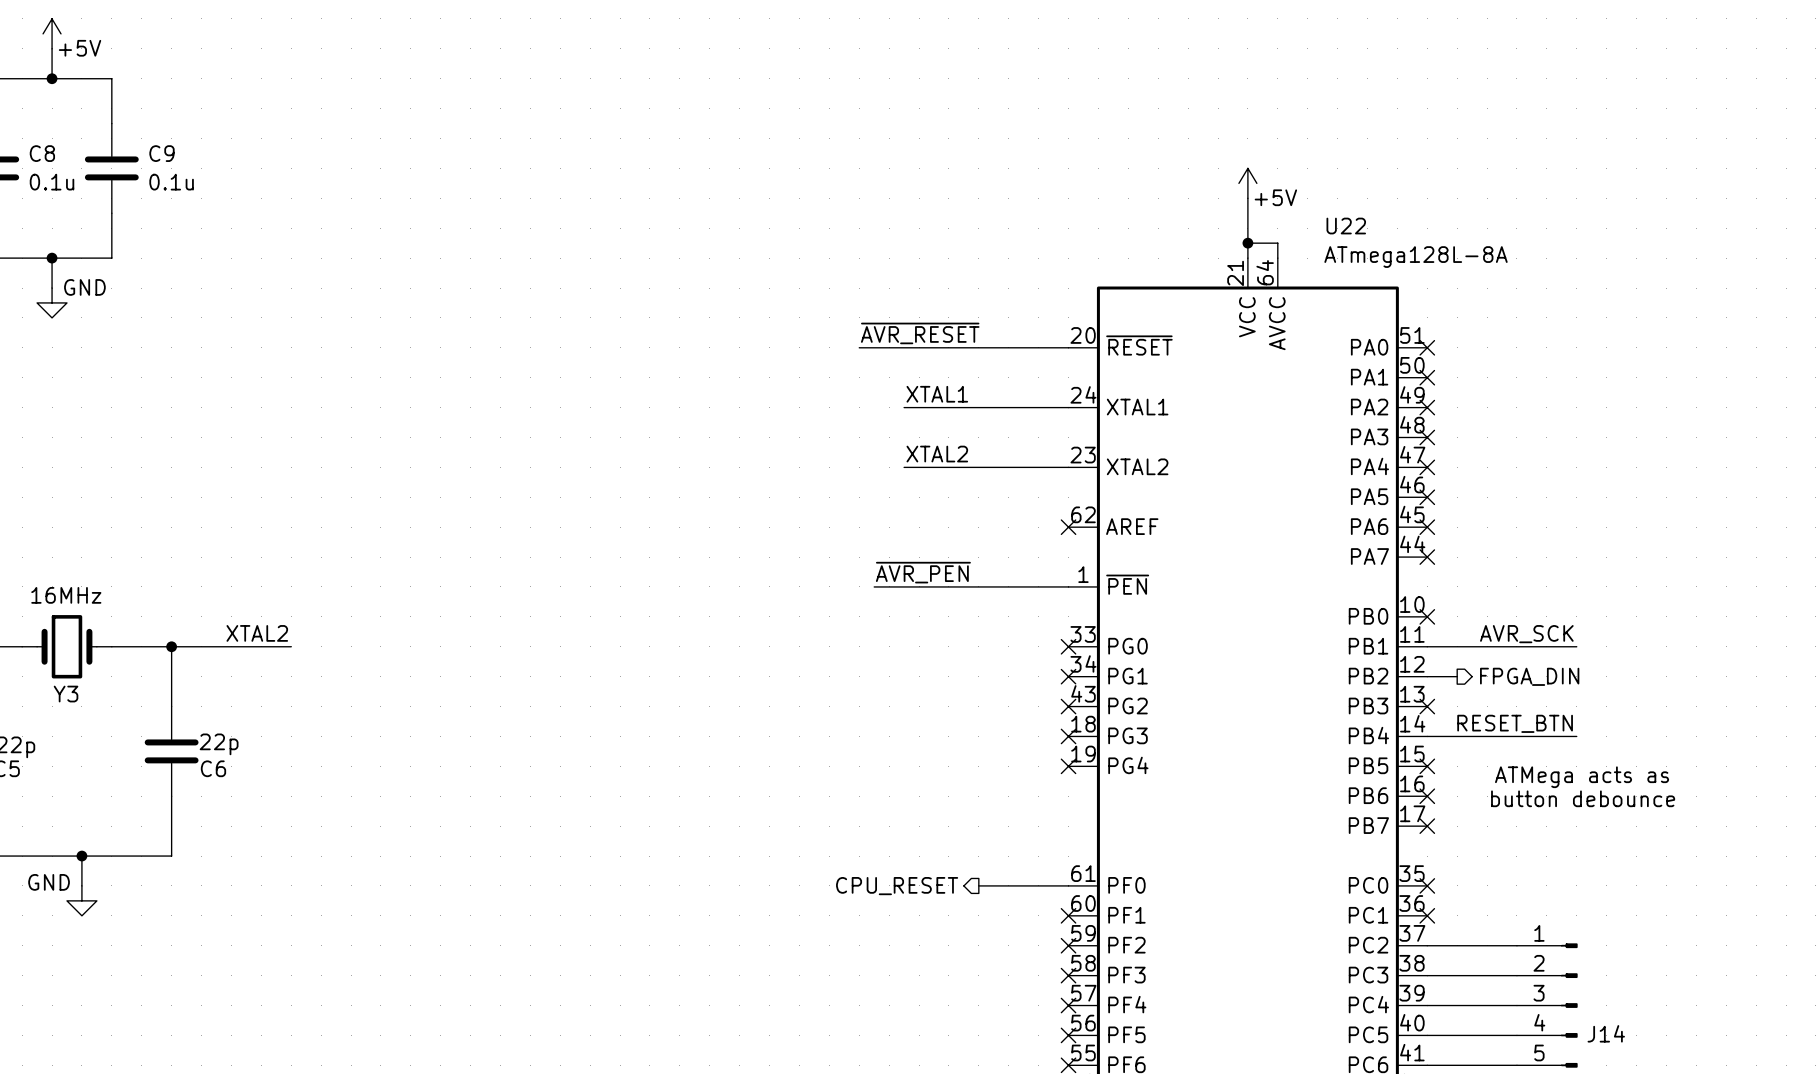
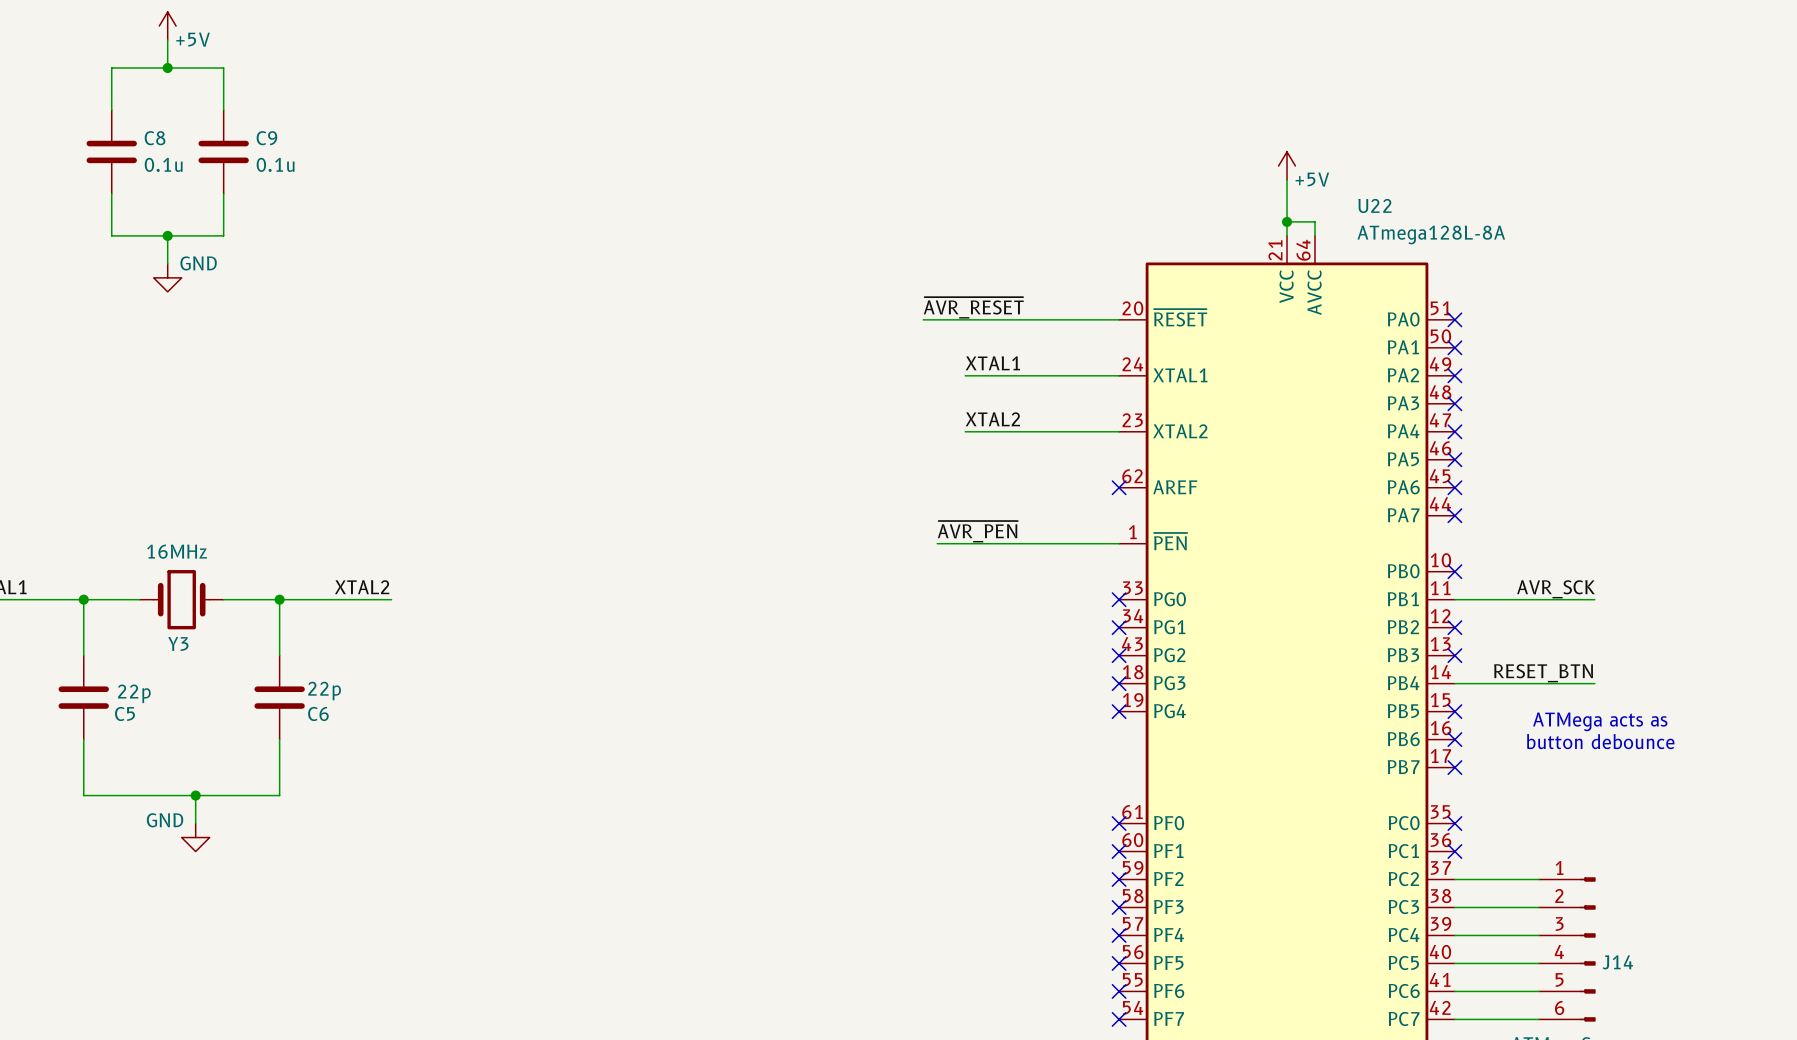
wire: (1427, 676) (1457, 676) -> none
no-connect mark: none -> (1454, 627)
hierarchical label: FPGA_DIN (1529, 676) -> none
wire: (978, 885) (1068, 885) -> none
no-connect mark: none -> (1119, 823)
hierarchical label: CPU_RESET (897, 886) -> none

